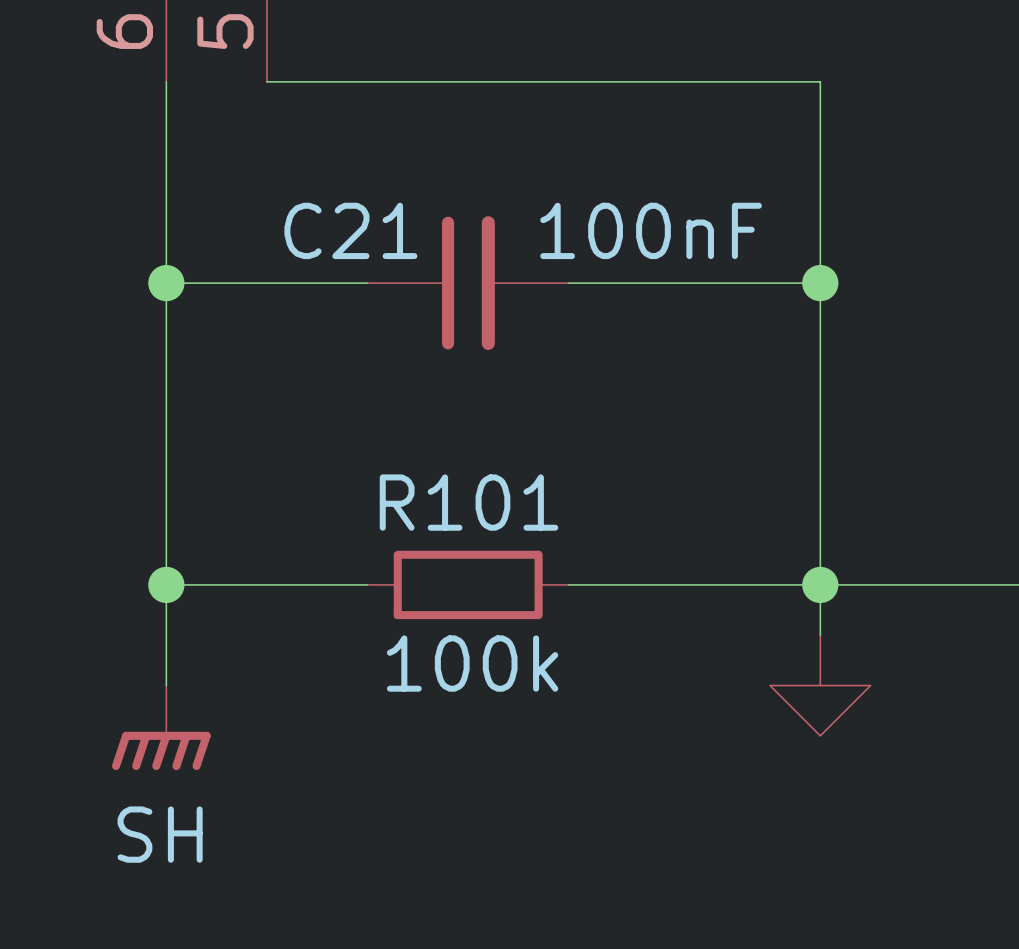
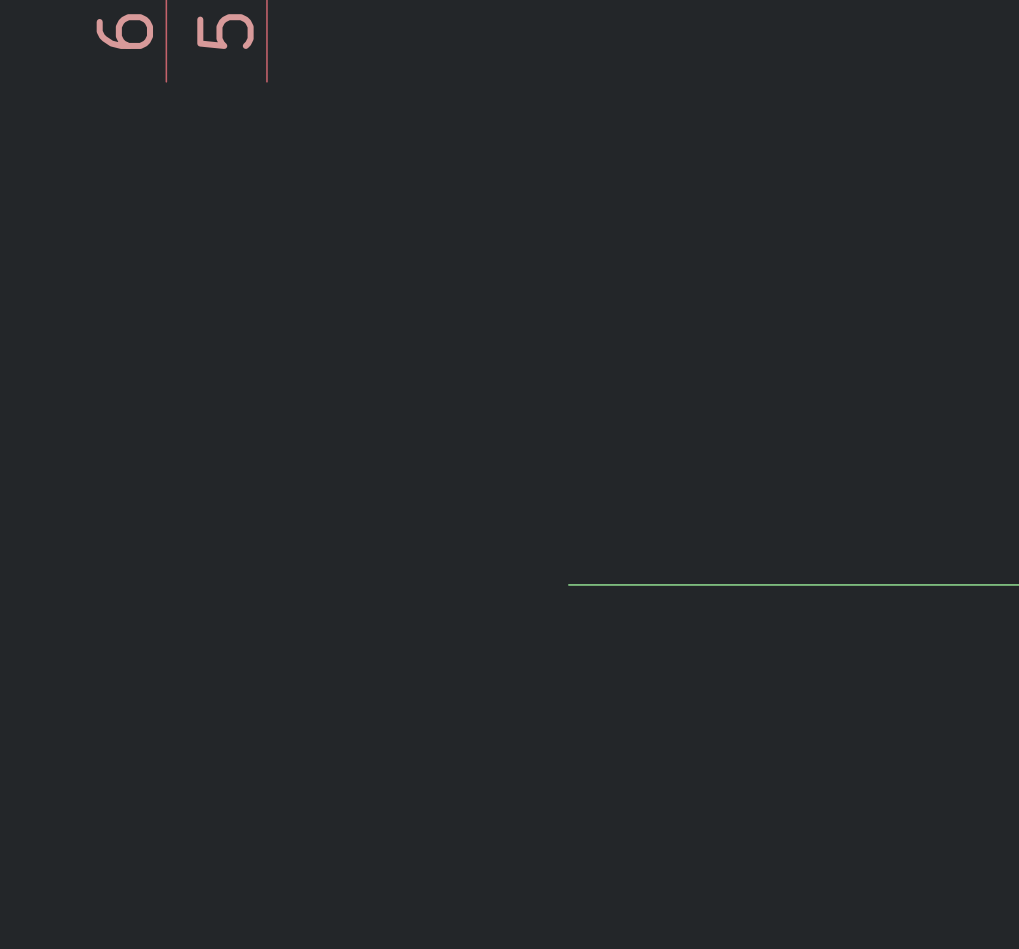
wire: (166, 81) (166, 685) -> none
wire: (266, 81) (820, 81) (820, 635) -> none
wire: (166, 283) (367, 283) -> none
junction: (166, 283) -> none
C21: 100nF (468, 283) -> none
wire: (568, 283) (820, 283) -> none
junction: (820, 283) -> none
wire: (166, 584) (367, 584) -> none
junction: (166, 584) -> none
R101: 100k (468, 584) -> none
junction: (820, 584) -> none
power symbol: (820, 685) -> none
power symbol: SH (161, 727) -> none

